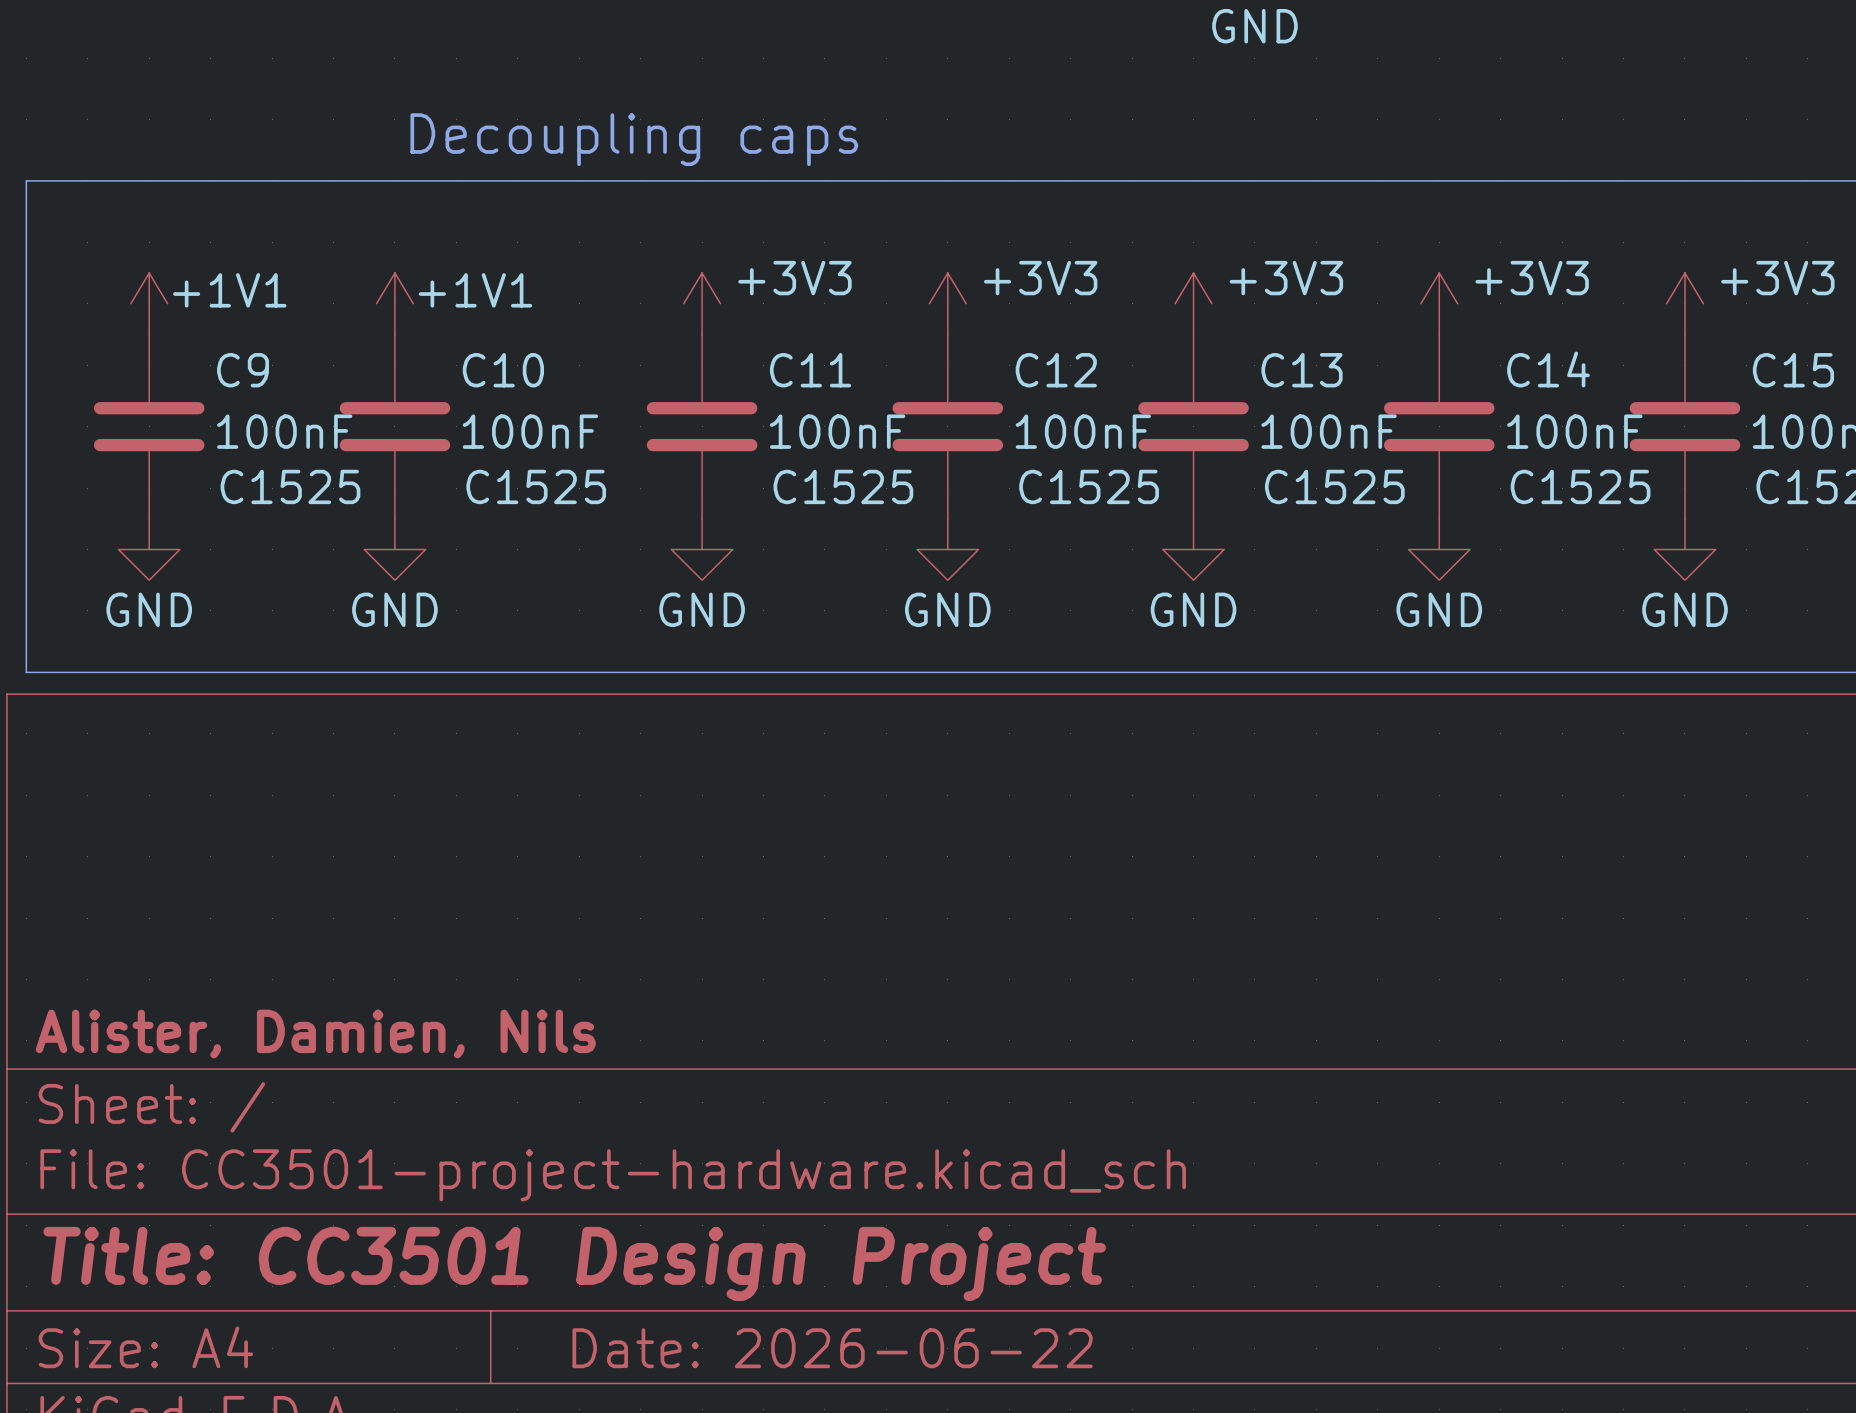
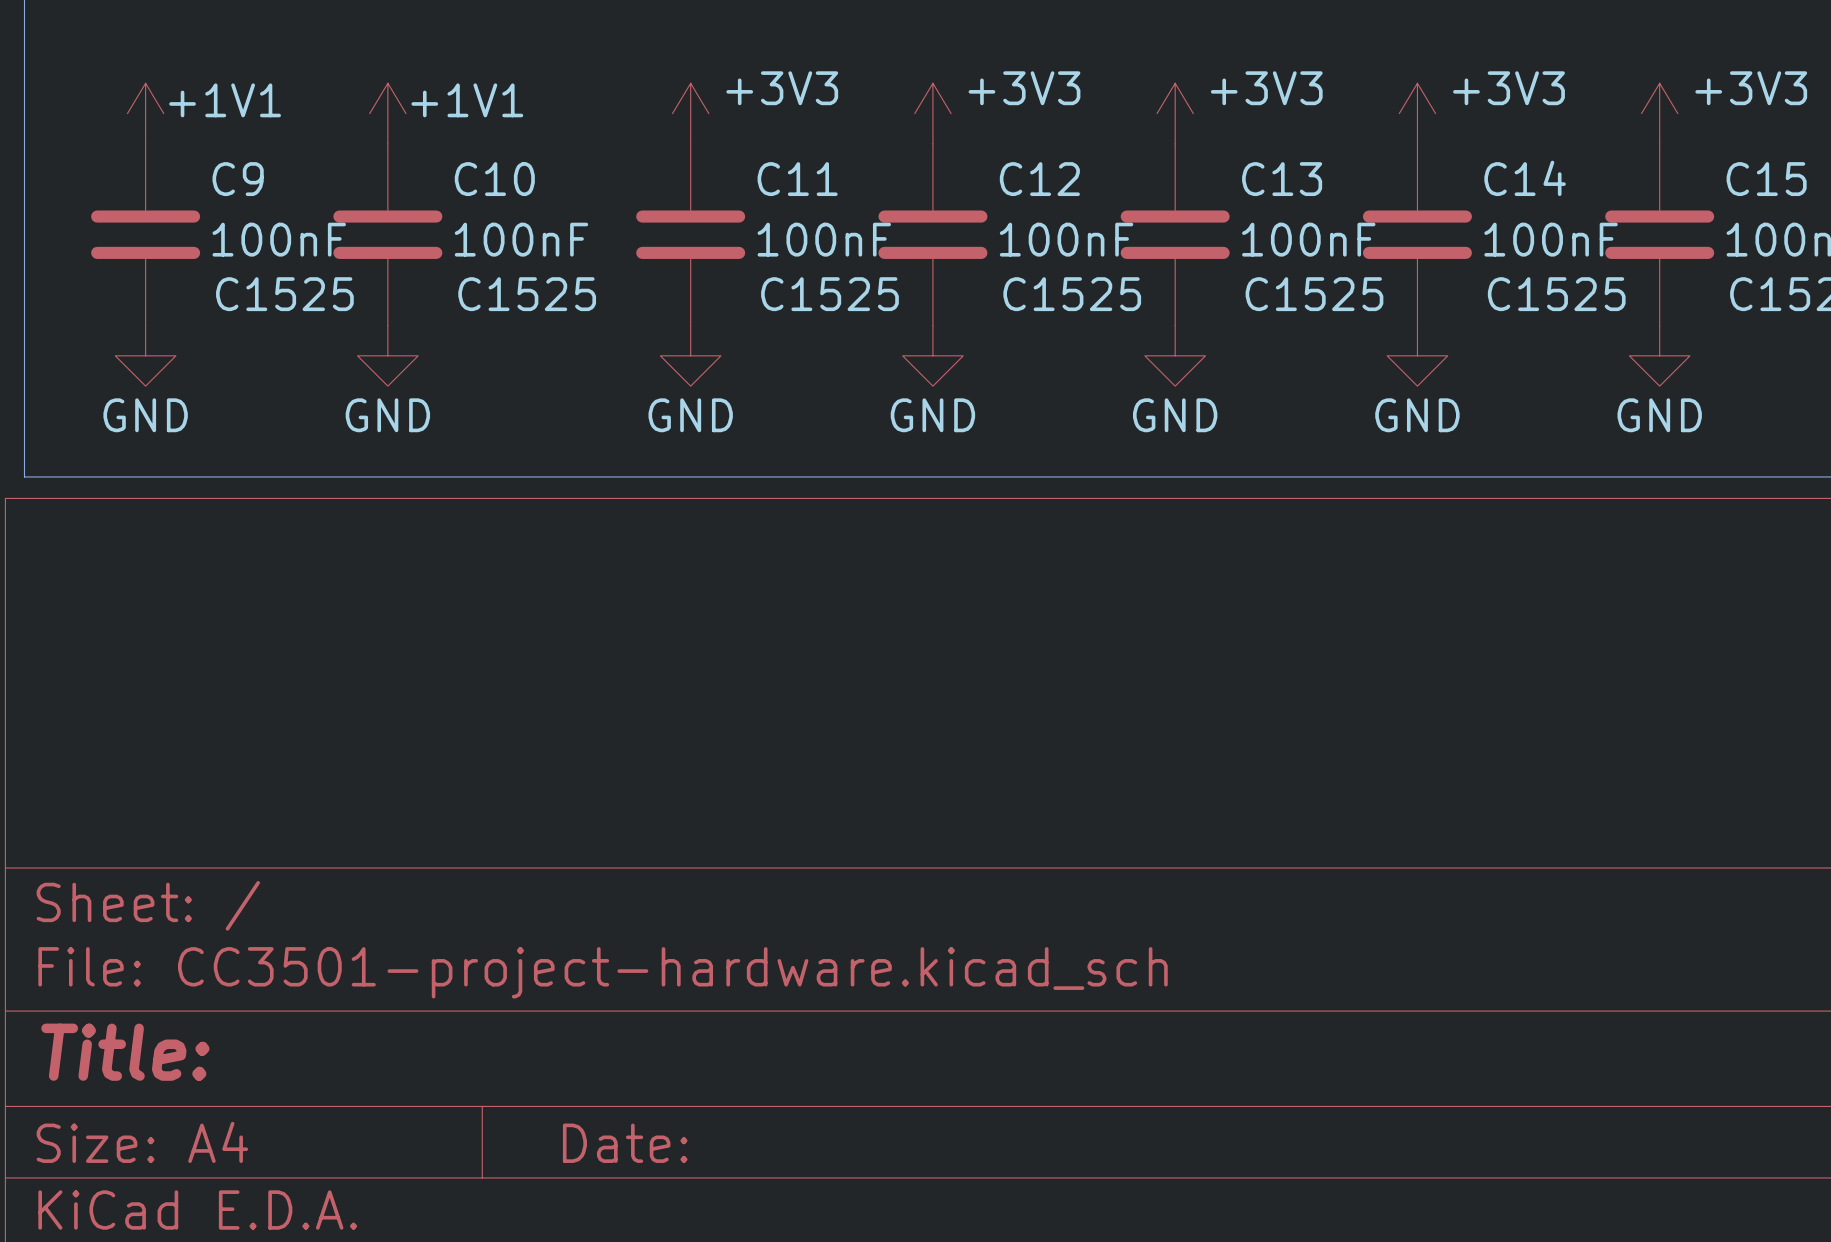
title block: Alister, Damien, Nils (315, 1033) -> none
title block: Title: CC3501 Design Project (574, 1263) -> Title: (125, 1052)
title block: Date: 2026-06-22 (832, 1348) -> Date: (625, 1143)

